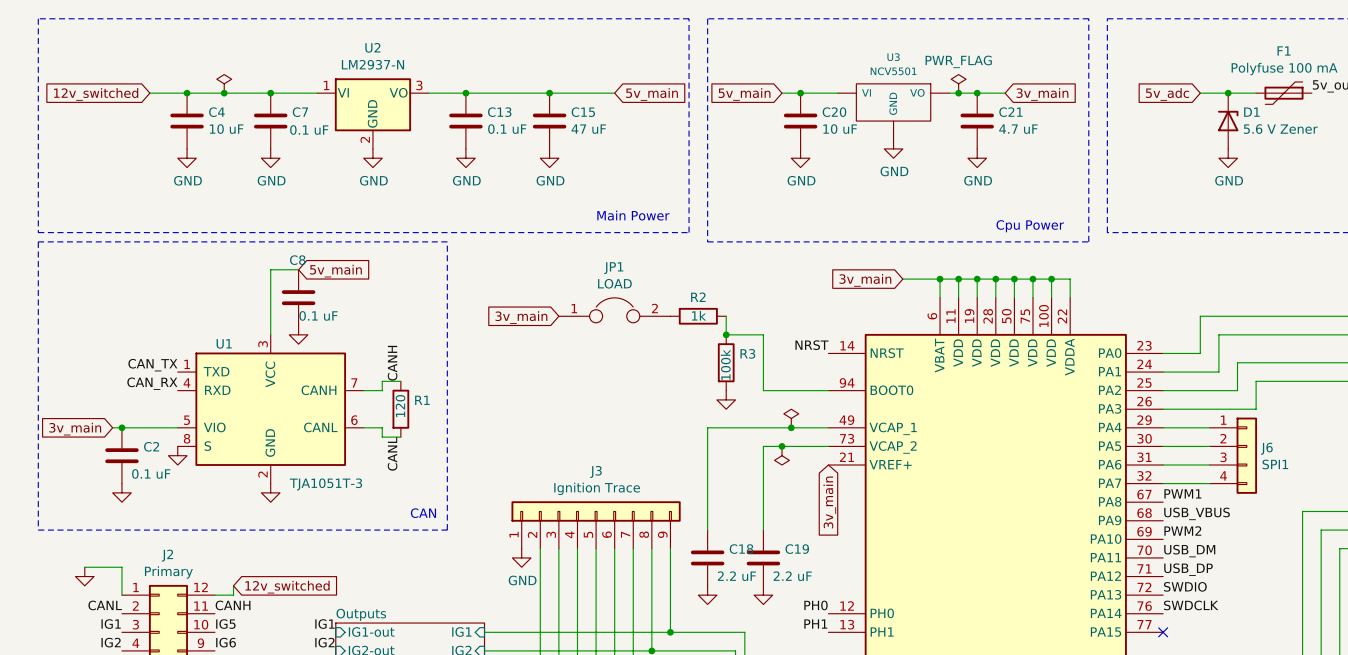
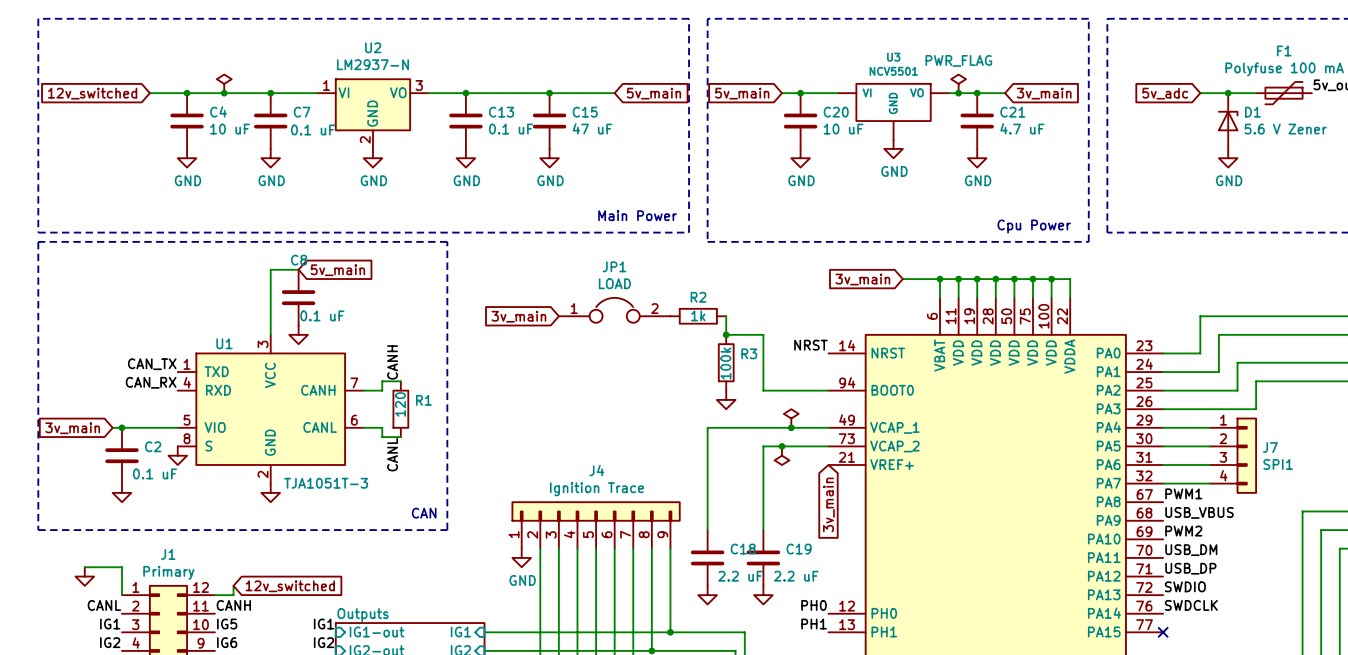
J6 name: J6 (1266, 448) -> J7 (1270, 447)
J3 name: J3 (595, 471) -> J4 (596, 470)
J2 name: J2 (167, 555) -> J1 (168, 554)

